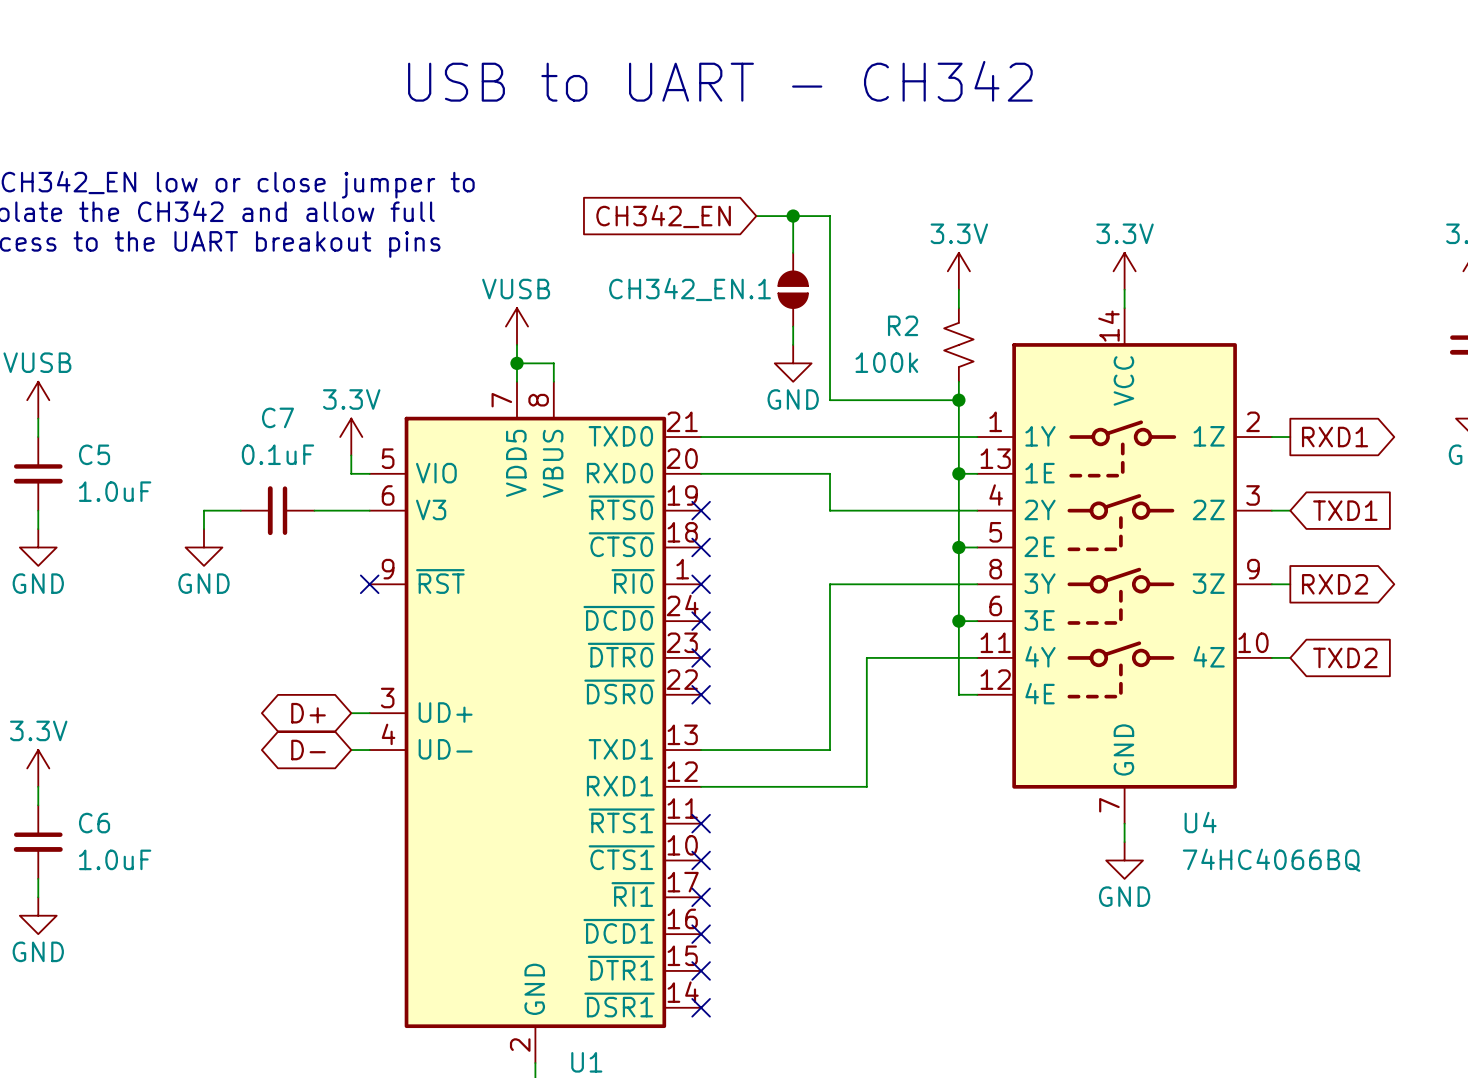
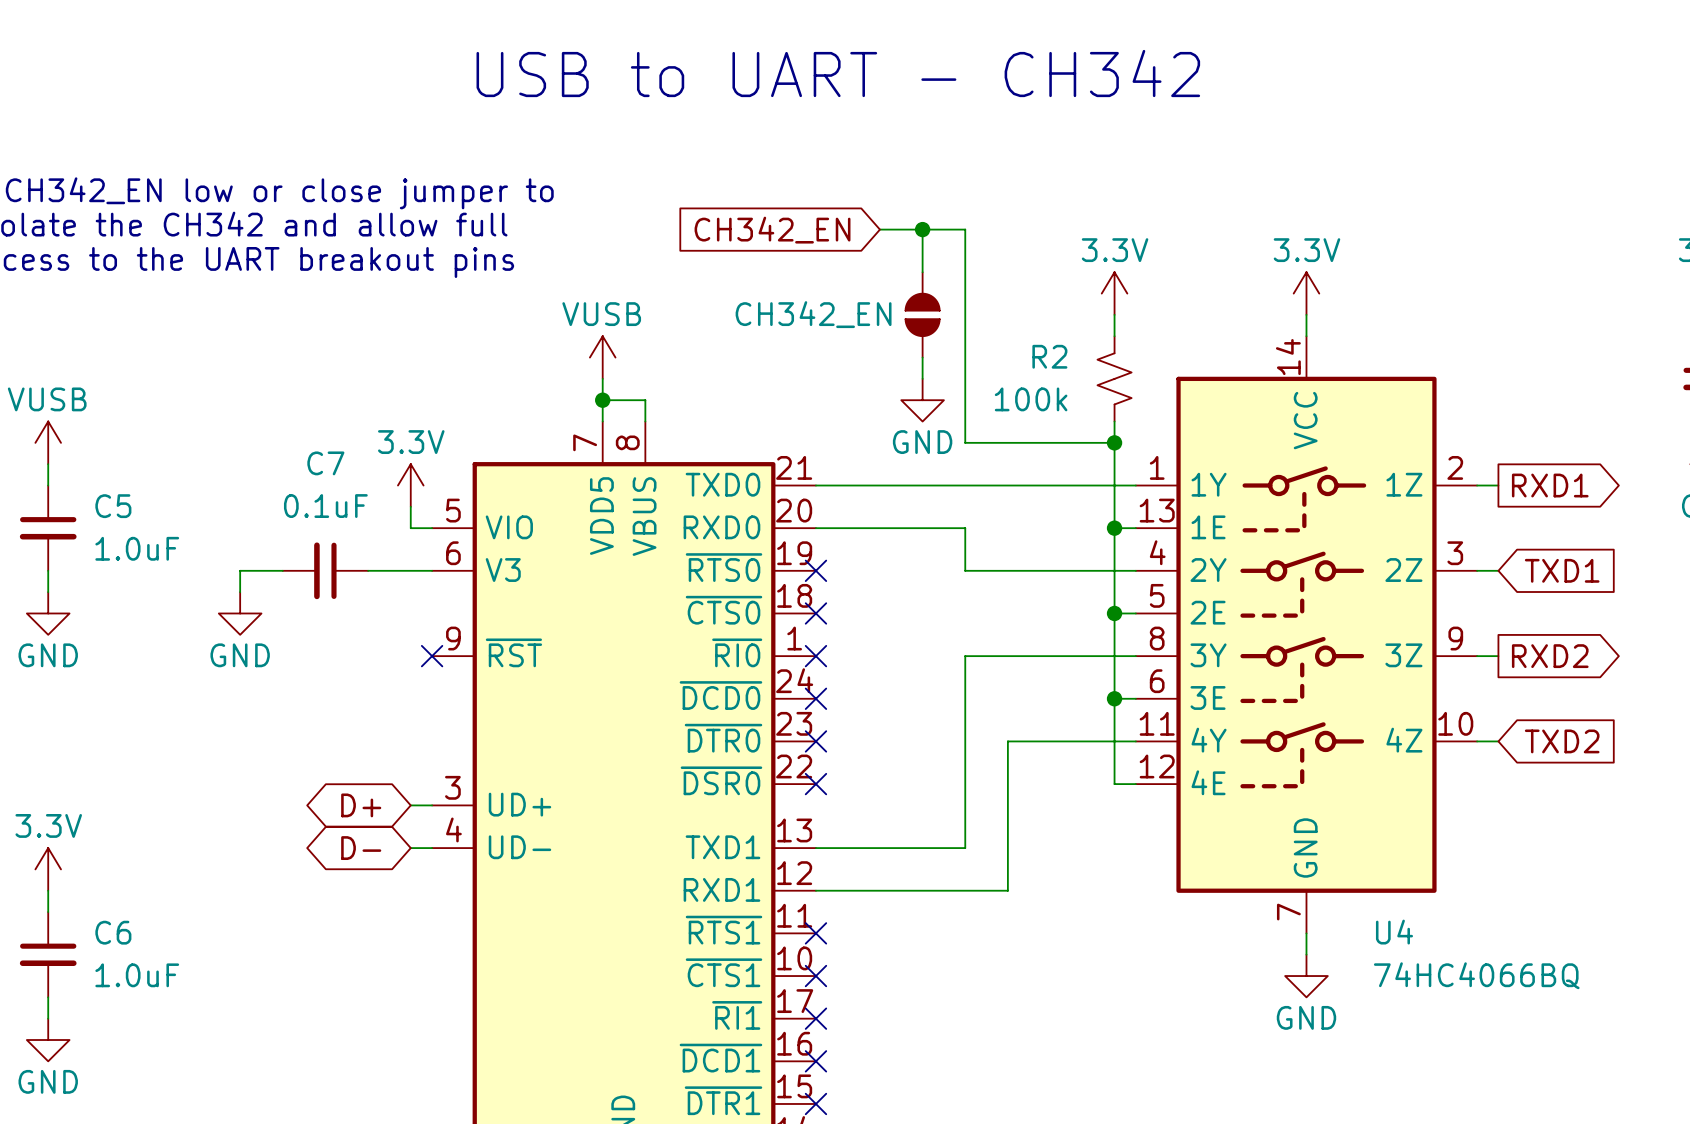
CH342_EN.1 name: CH342_EN.1 (690, 289) -> none
CH342_EN.1 value: none -> CH342_EN (813, 314)

